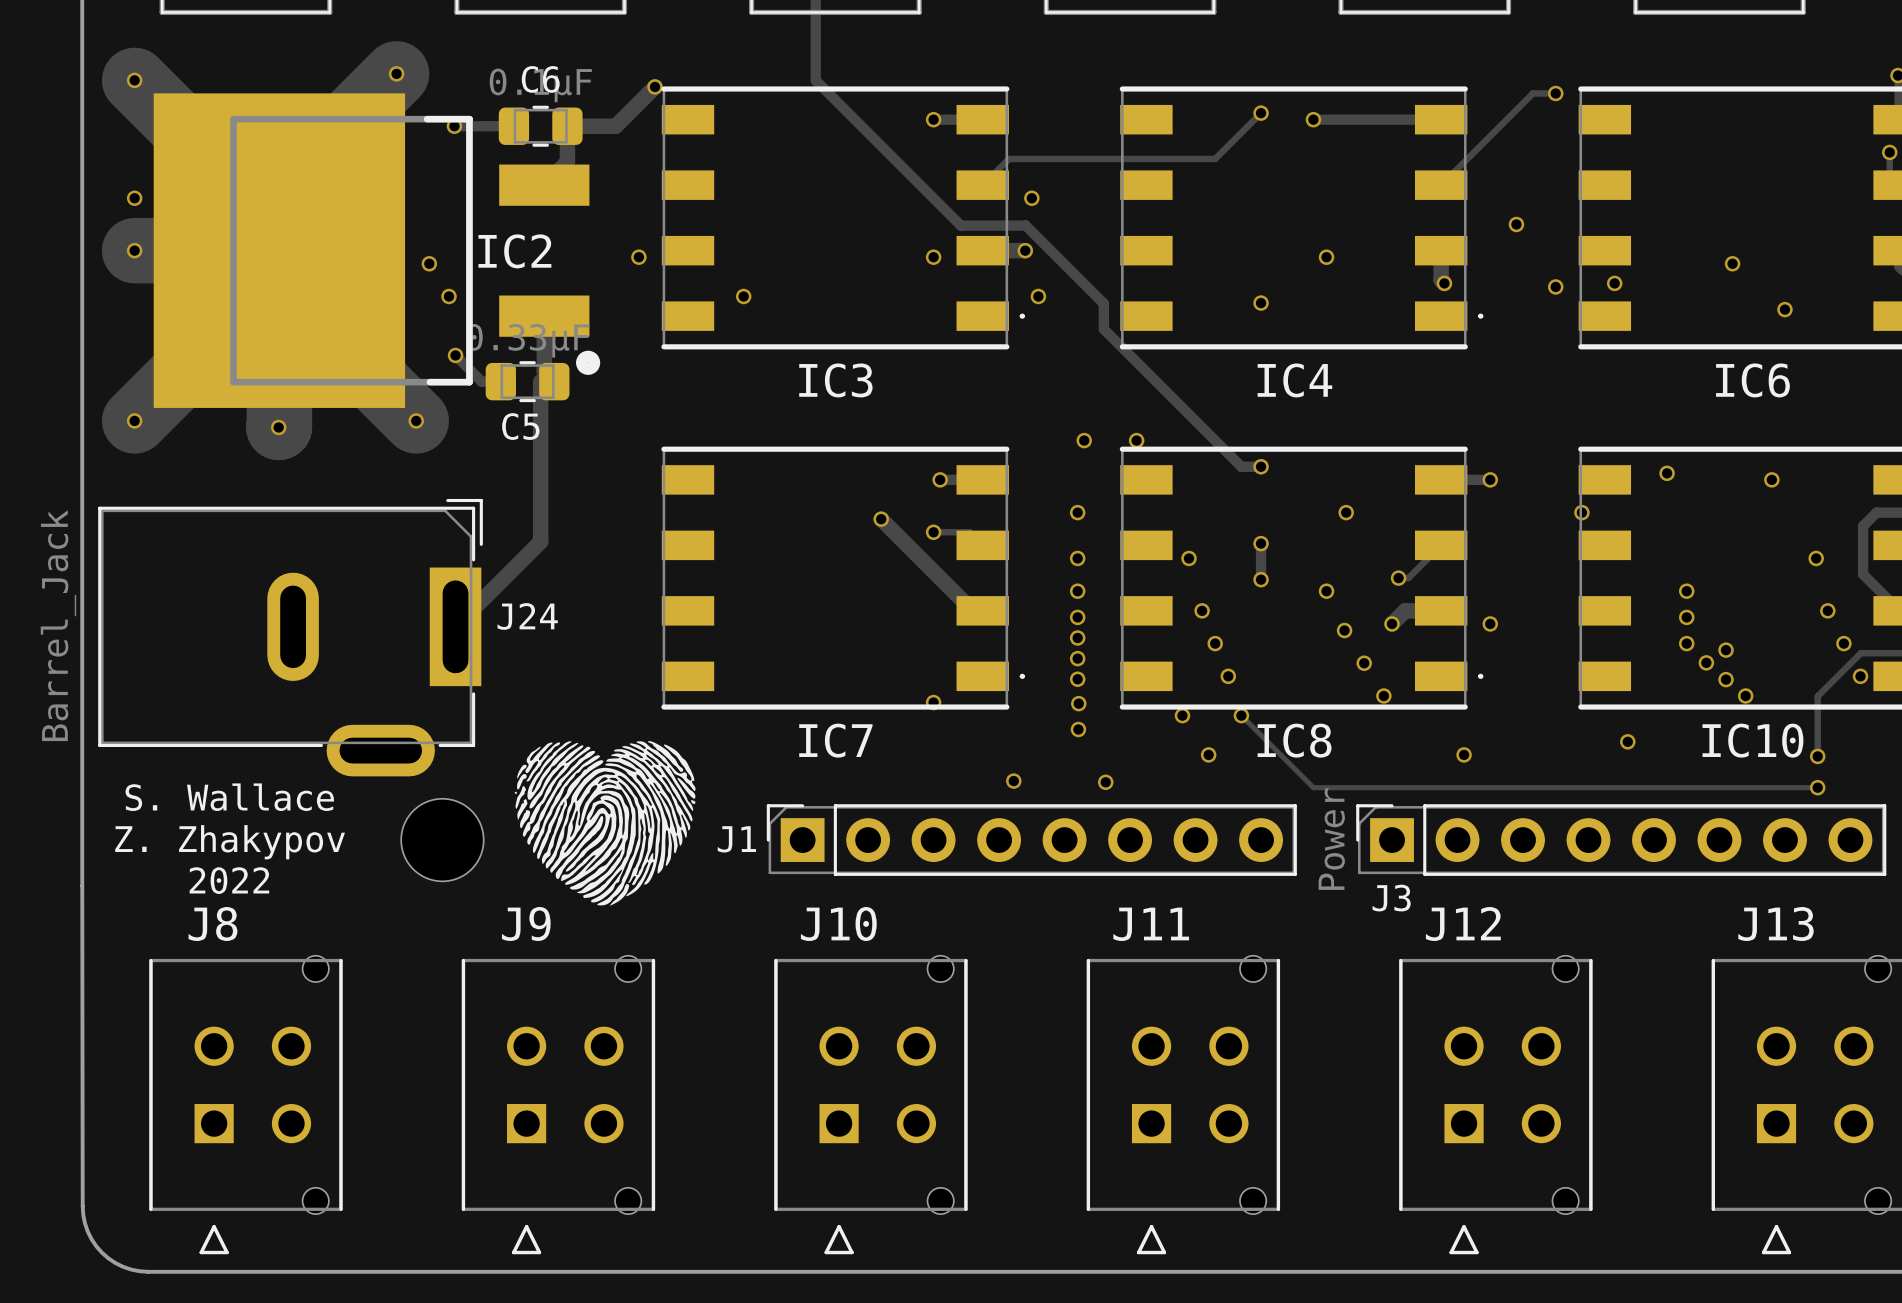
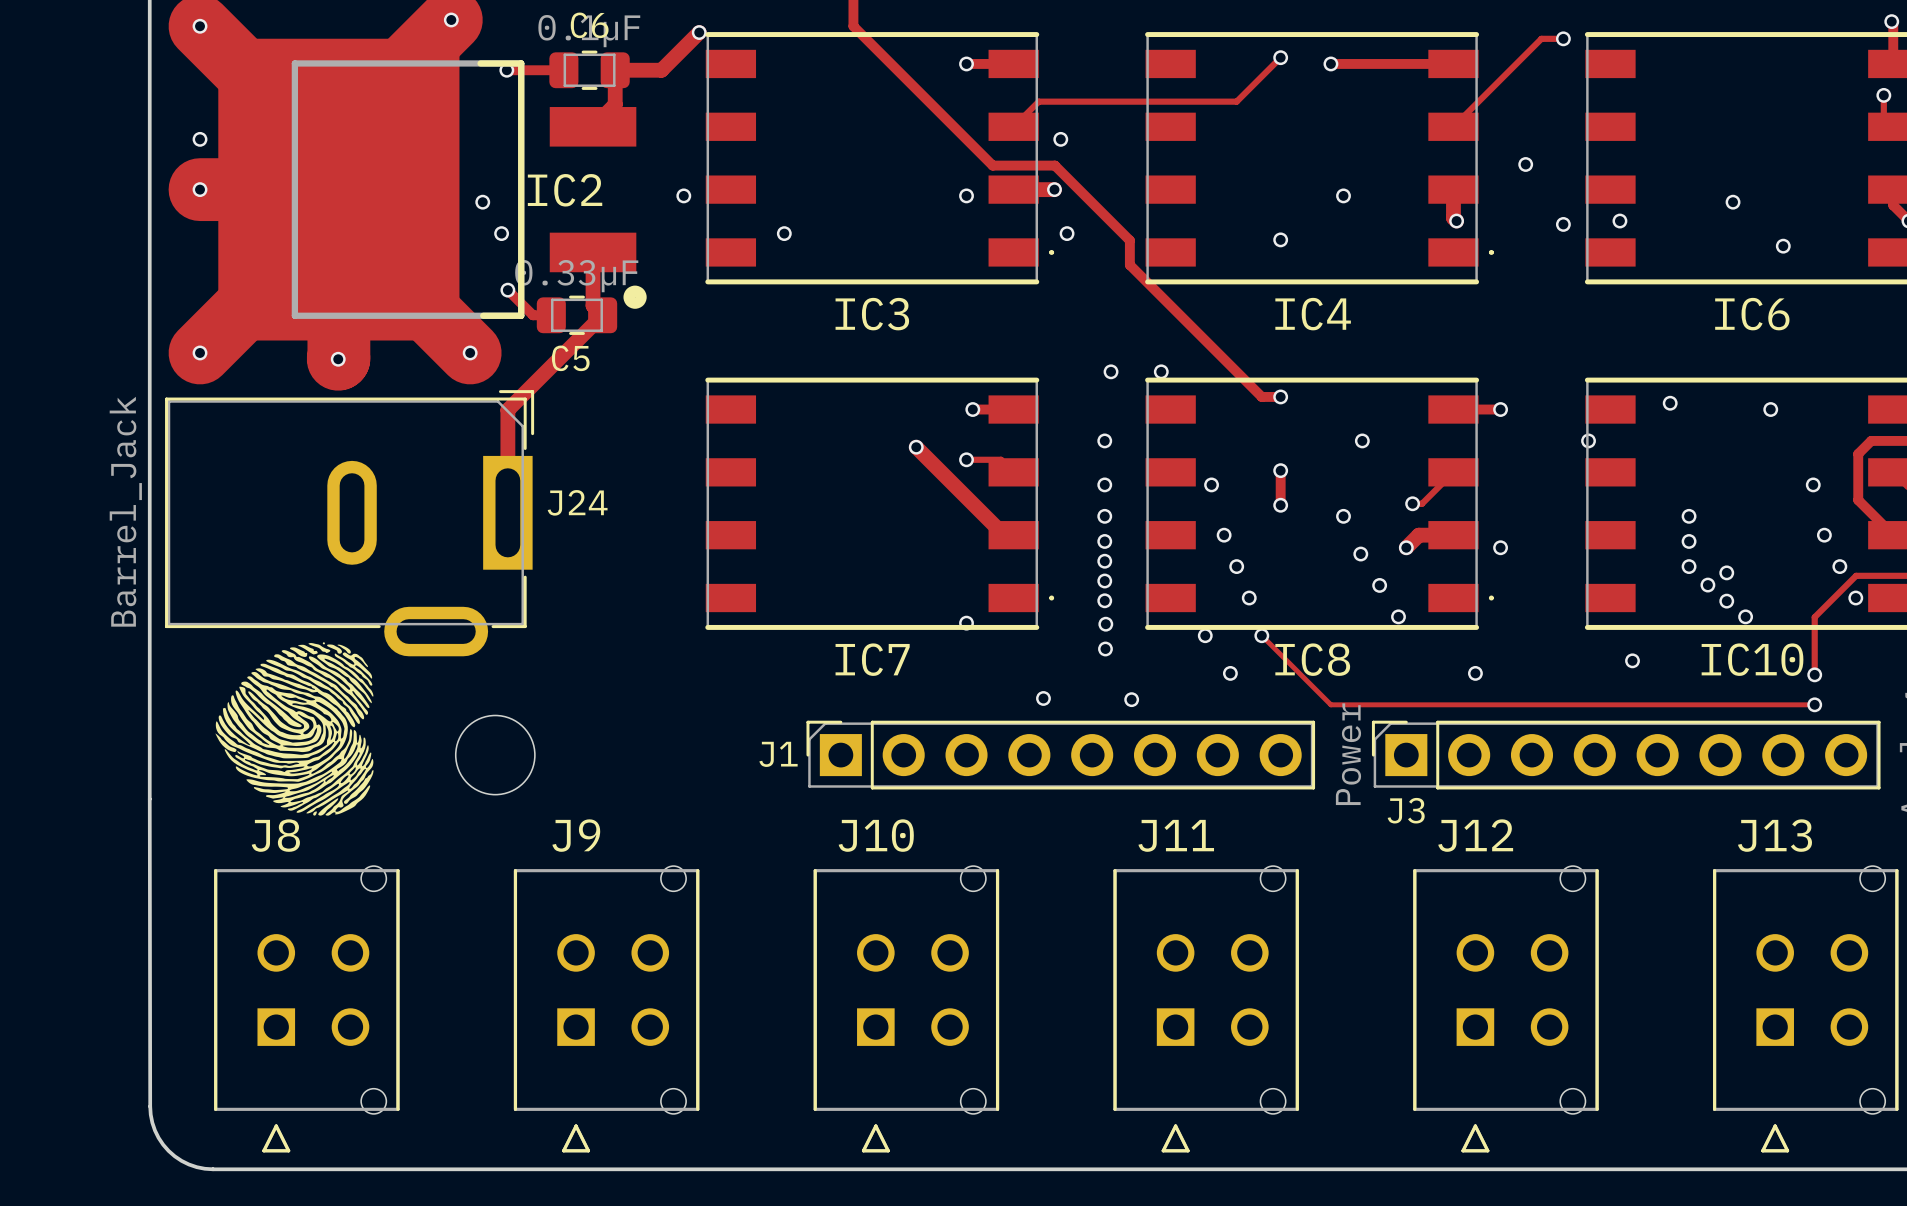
track: (540, 381) (540, 541) (455, 626) -> none
track: none -> (602, 315) (507, 410) (507, 512)
J24 position: (290, 637) -> (349, 523)
drawing: none -> [215, 642, 374, 816]
drawing: [514, 741, 696, 906] -> none
text: S. Wallace (229, 797) -> none
text: Z. Zhakypov (230, 842) -> none
text: 2022 (229, 880) -> none

